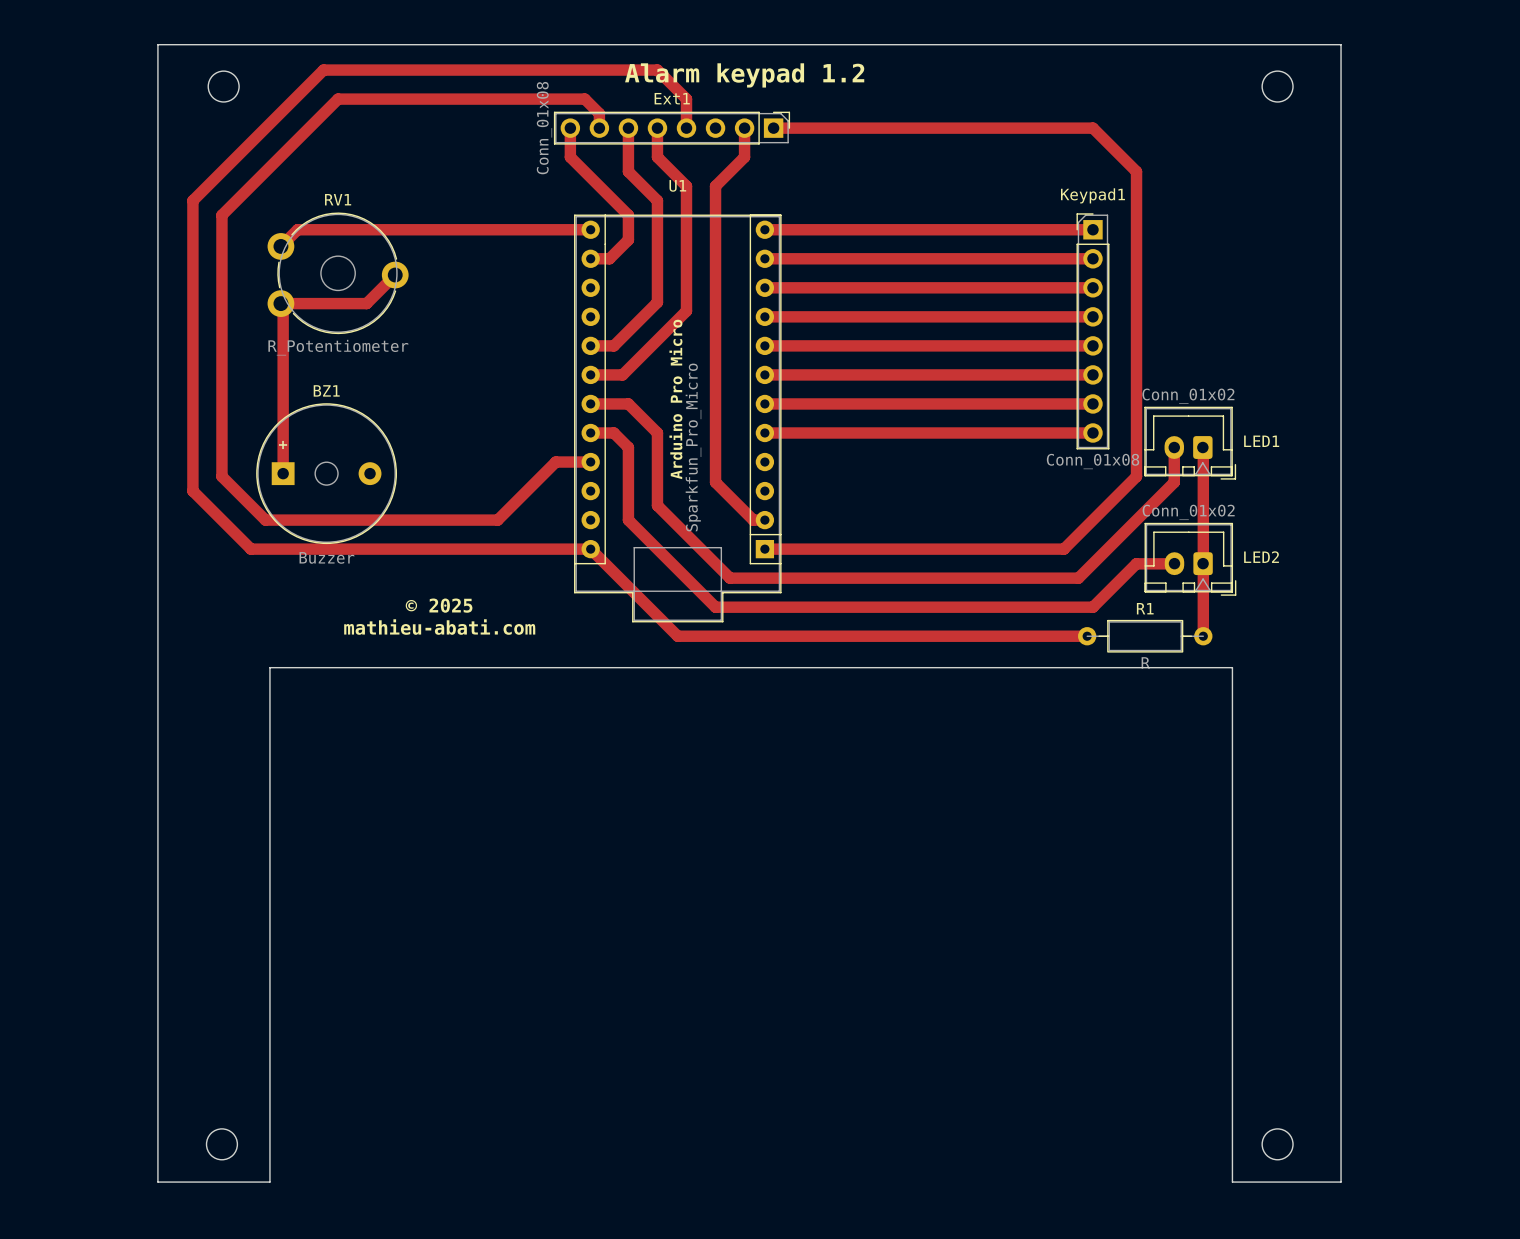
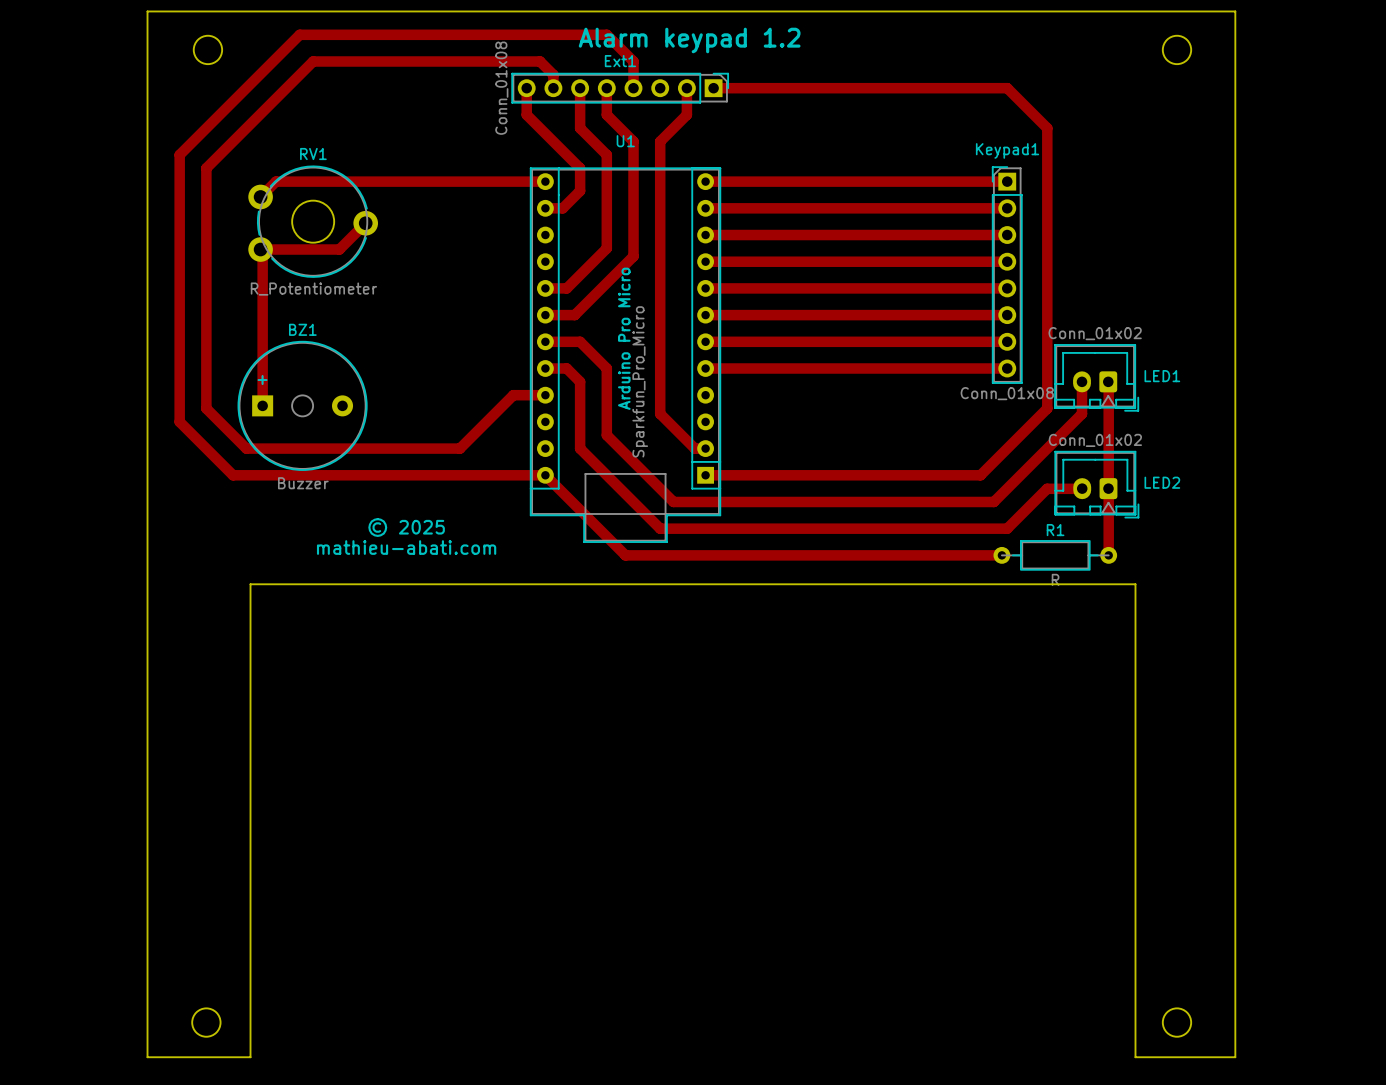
RV1 footprint: [267, 212, 409, 335] -> [248, 165, 379, 278]

